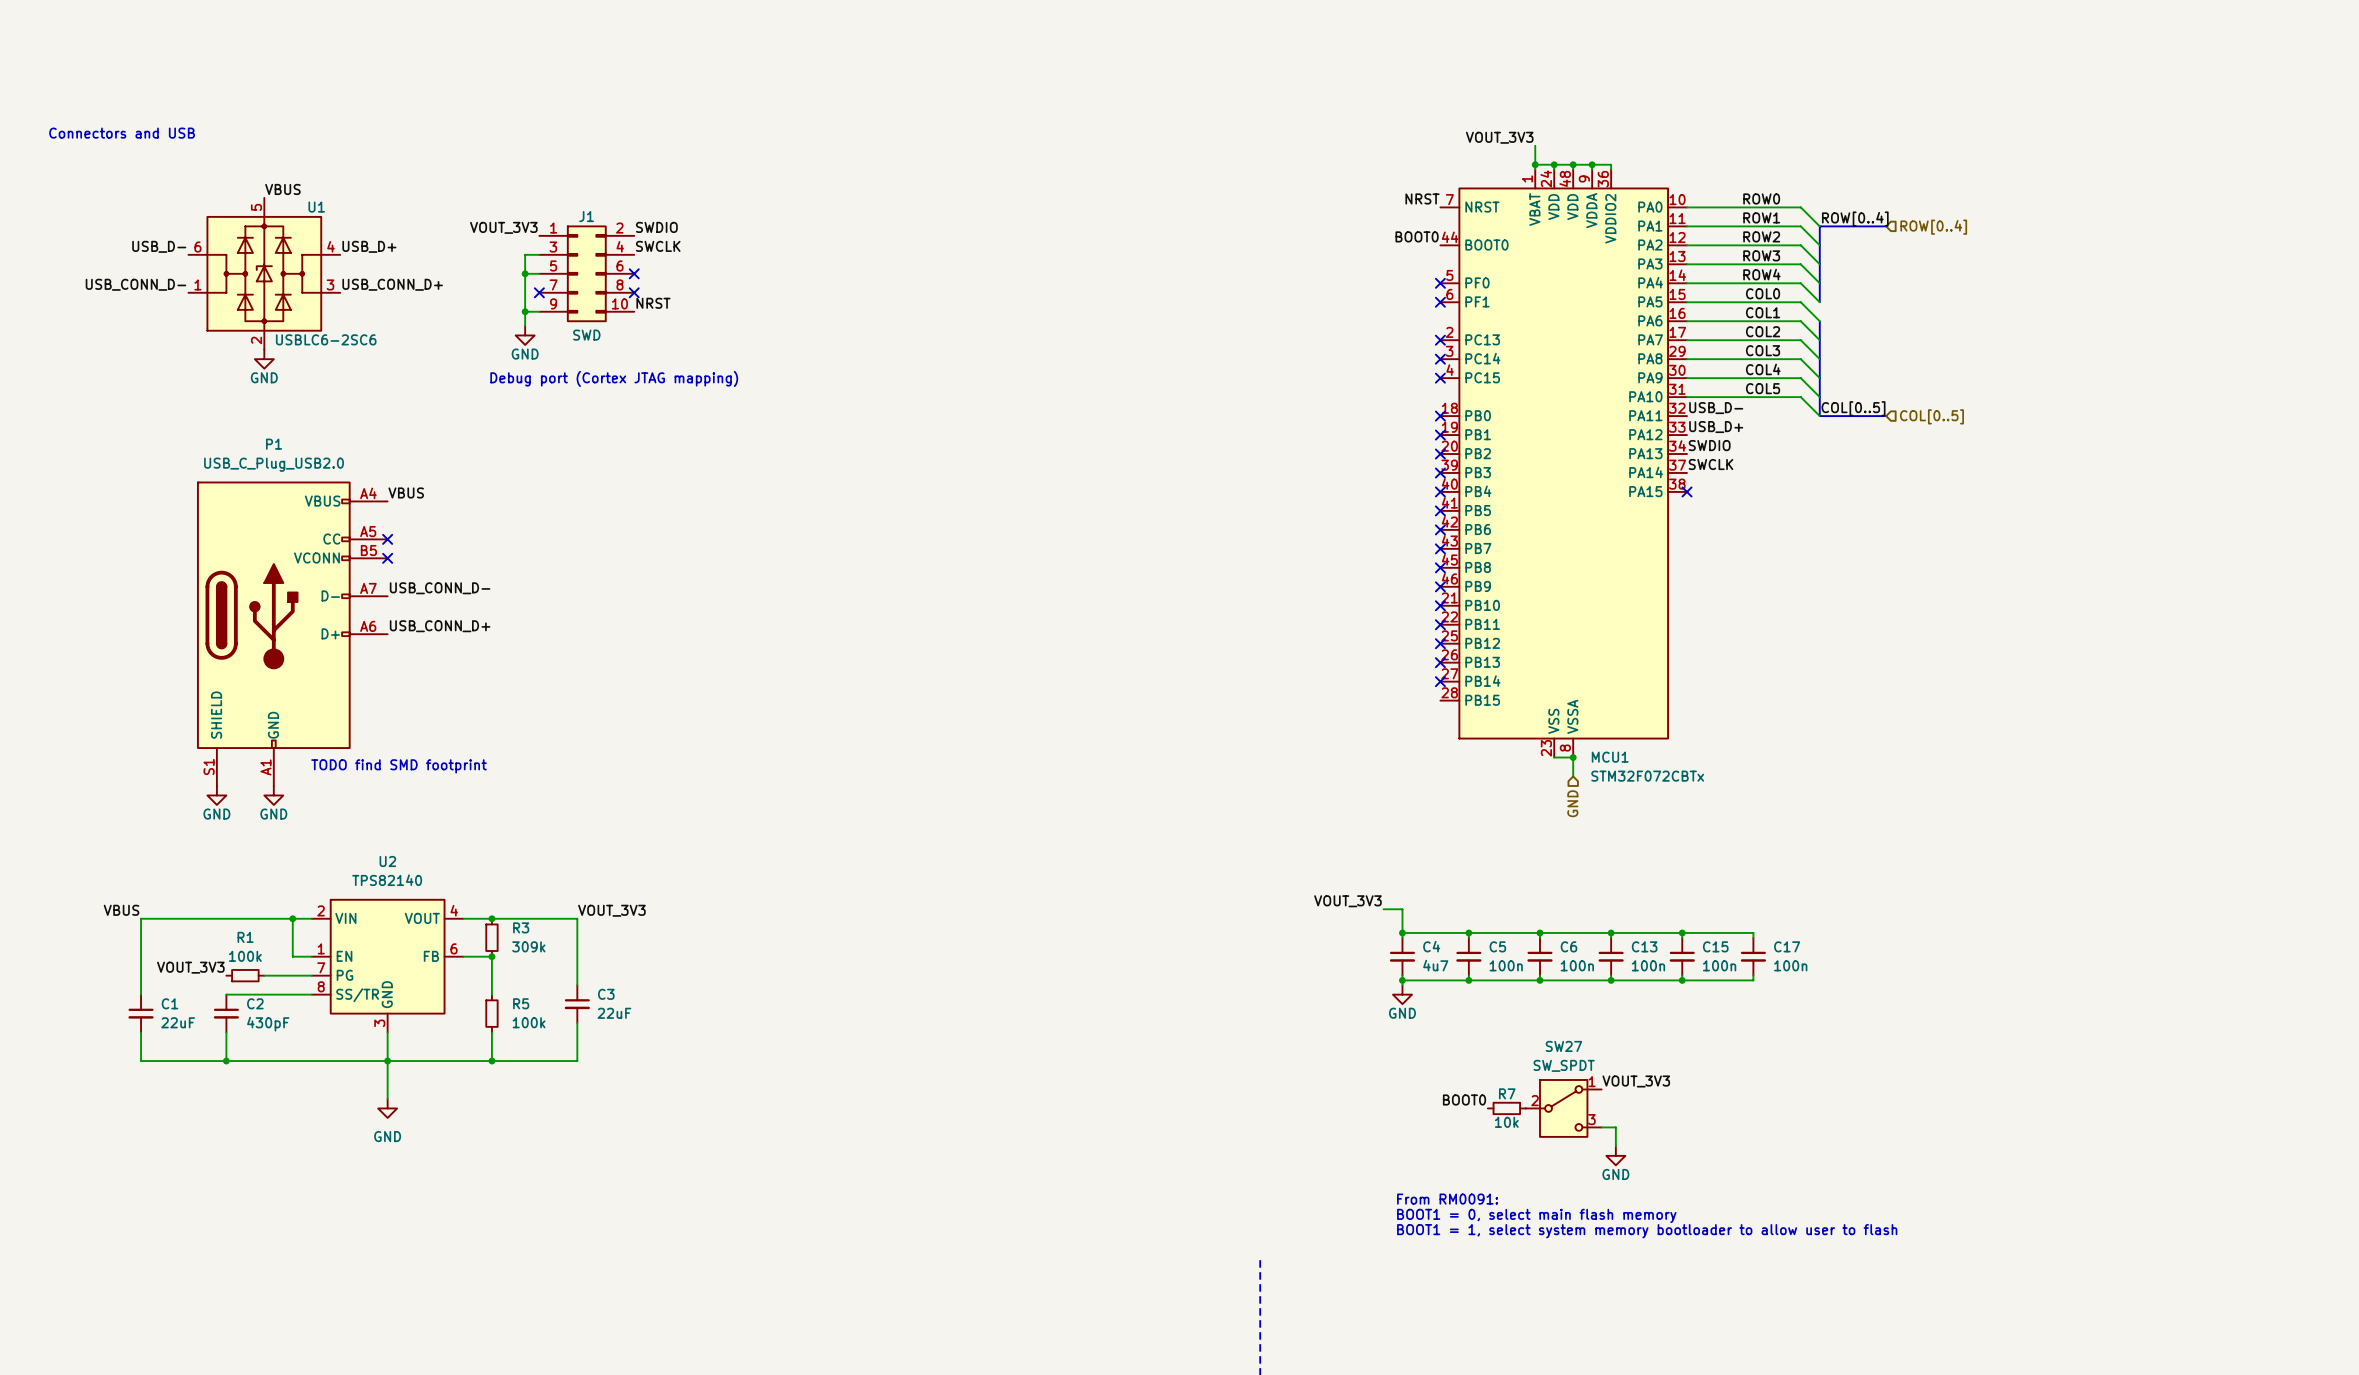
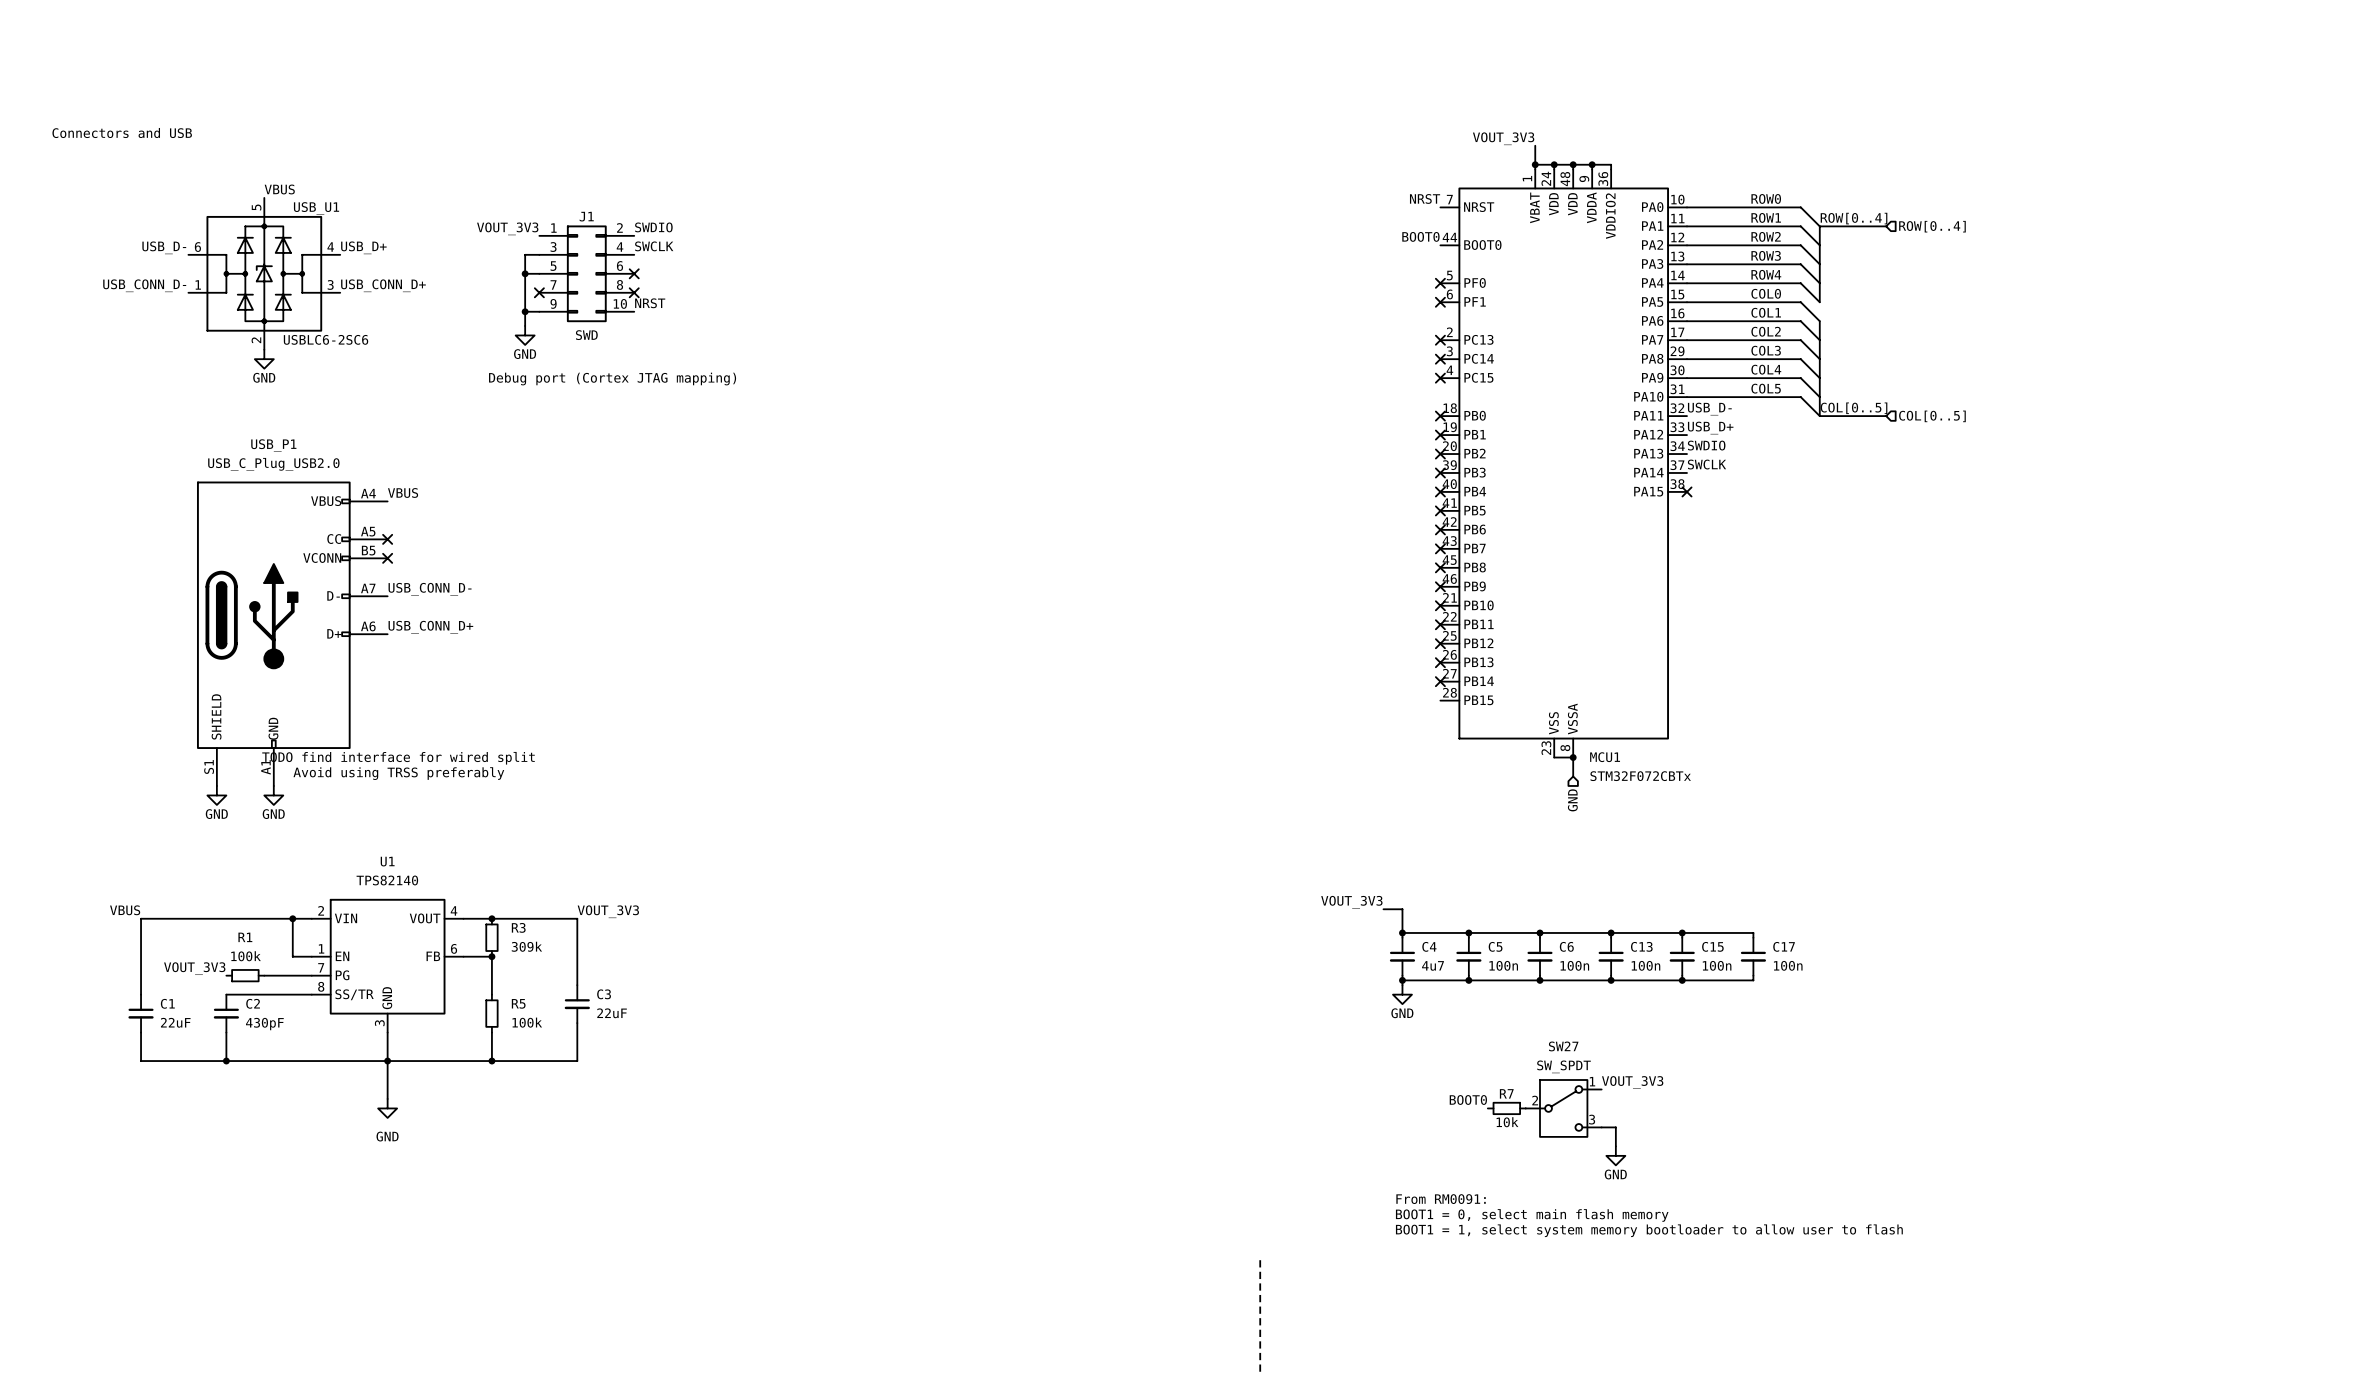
U1 name: U1 (316, 207) -> USB_U1 (316, 208)
P1 name: P1 (274, 444) -> USB_P1 (273, 445)
text: none -> TODO find interface for wired split (398, 758)
text: TODO find SMD footprint (399, 766) -> none
text: none -> Avoid using TRSS preferably (398, 773)
U2 name: U2 (387, 861) -> U1 (387, 861)

